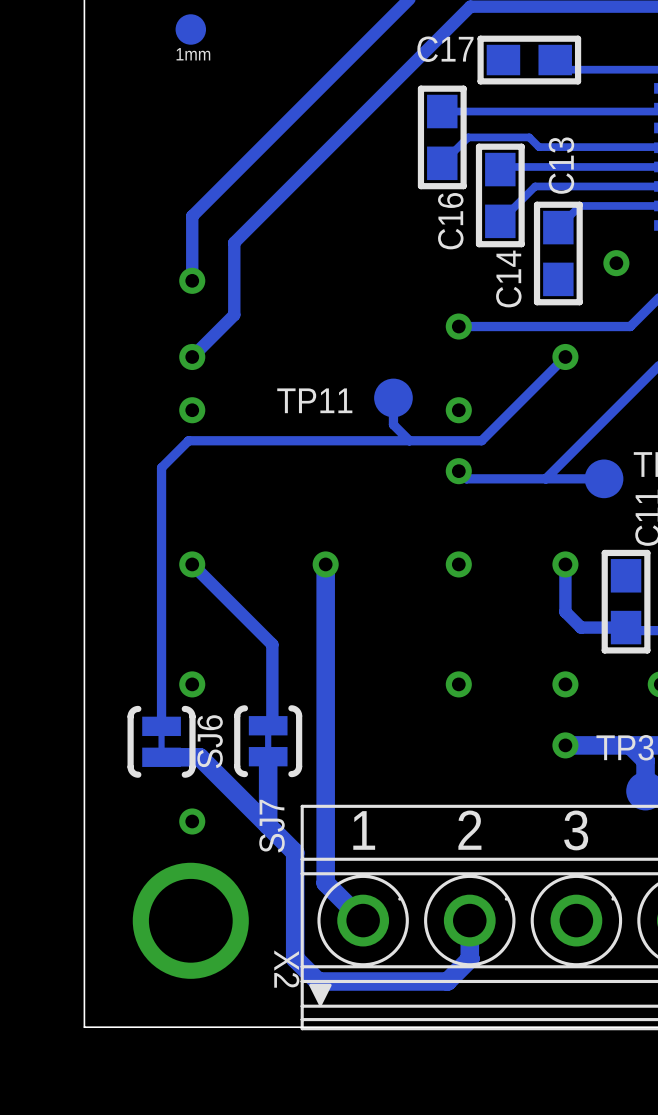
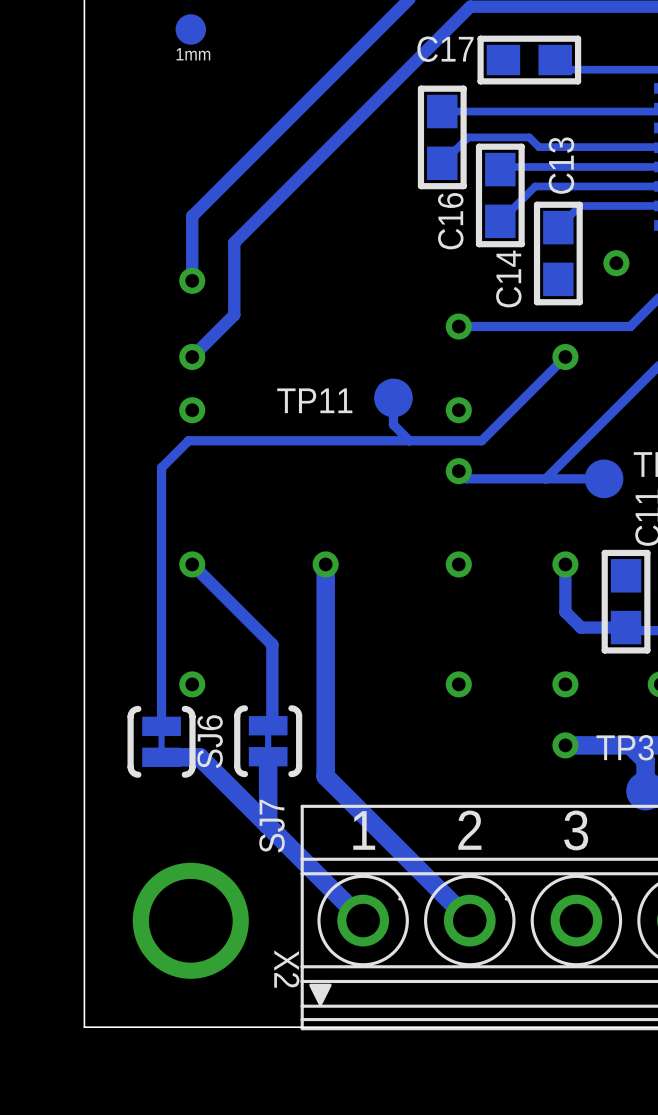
track: (325, 776) (325, 883) -> (295, 852) (325, 883)
via: (192, 821) -> none
track: (295, 852) (295, 958) (318, 981) (447, 981) (470, 958) (469, 920) -> (325, 776) (469, 920)

